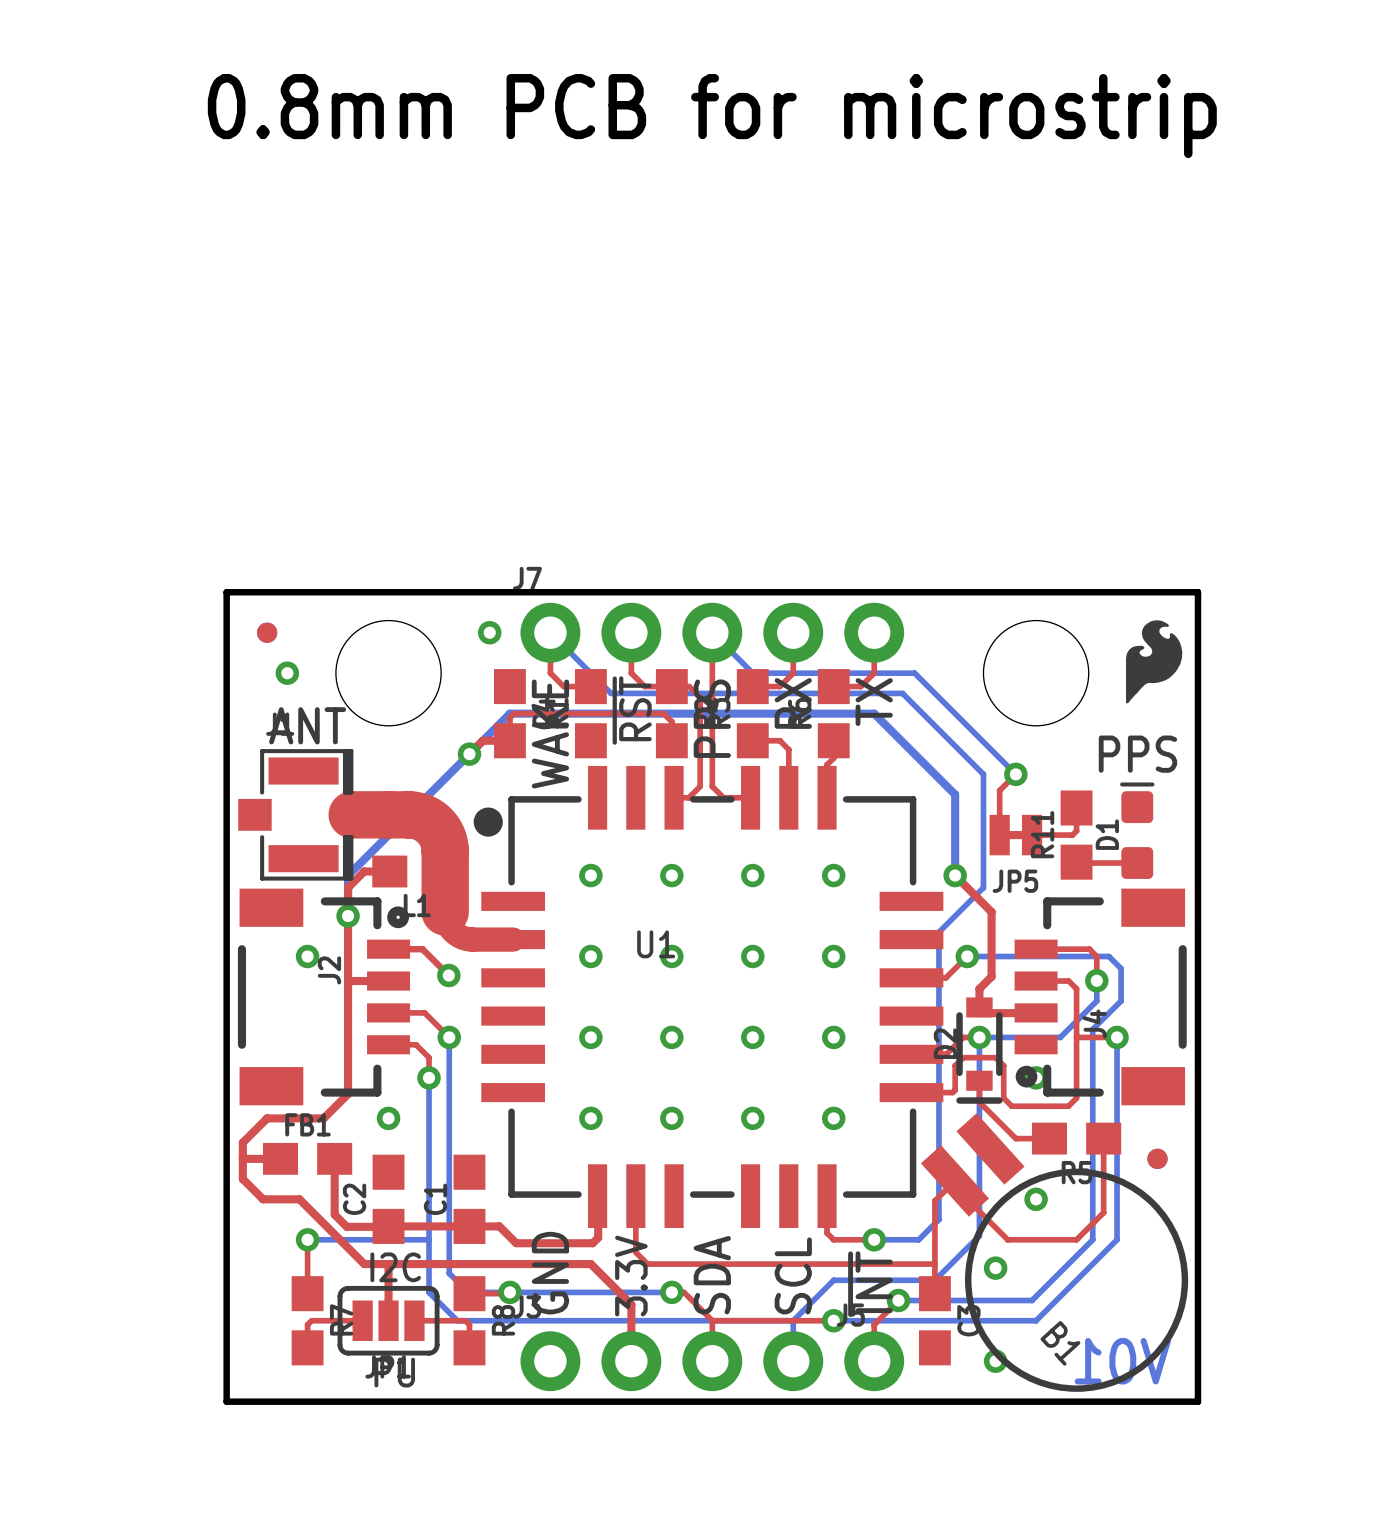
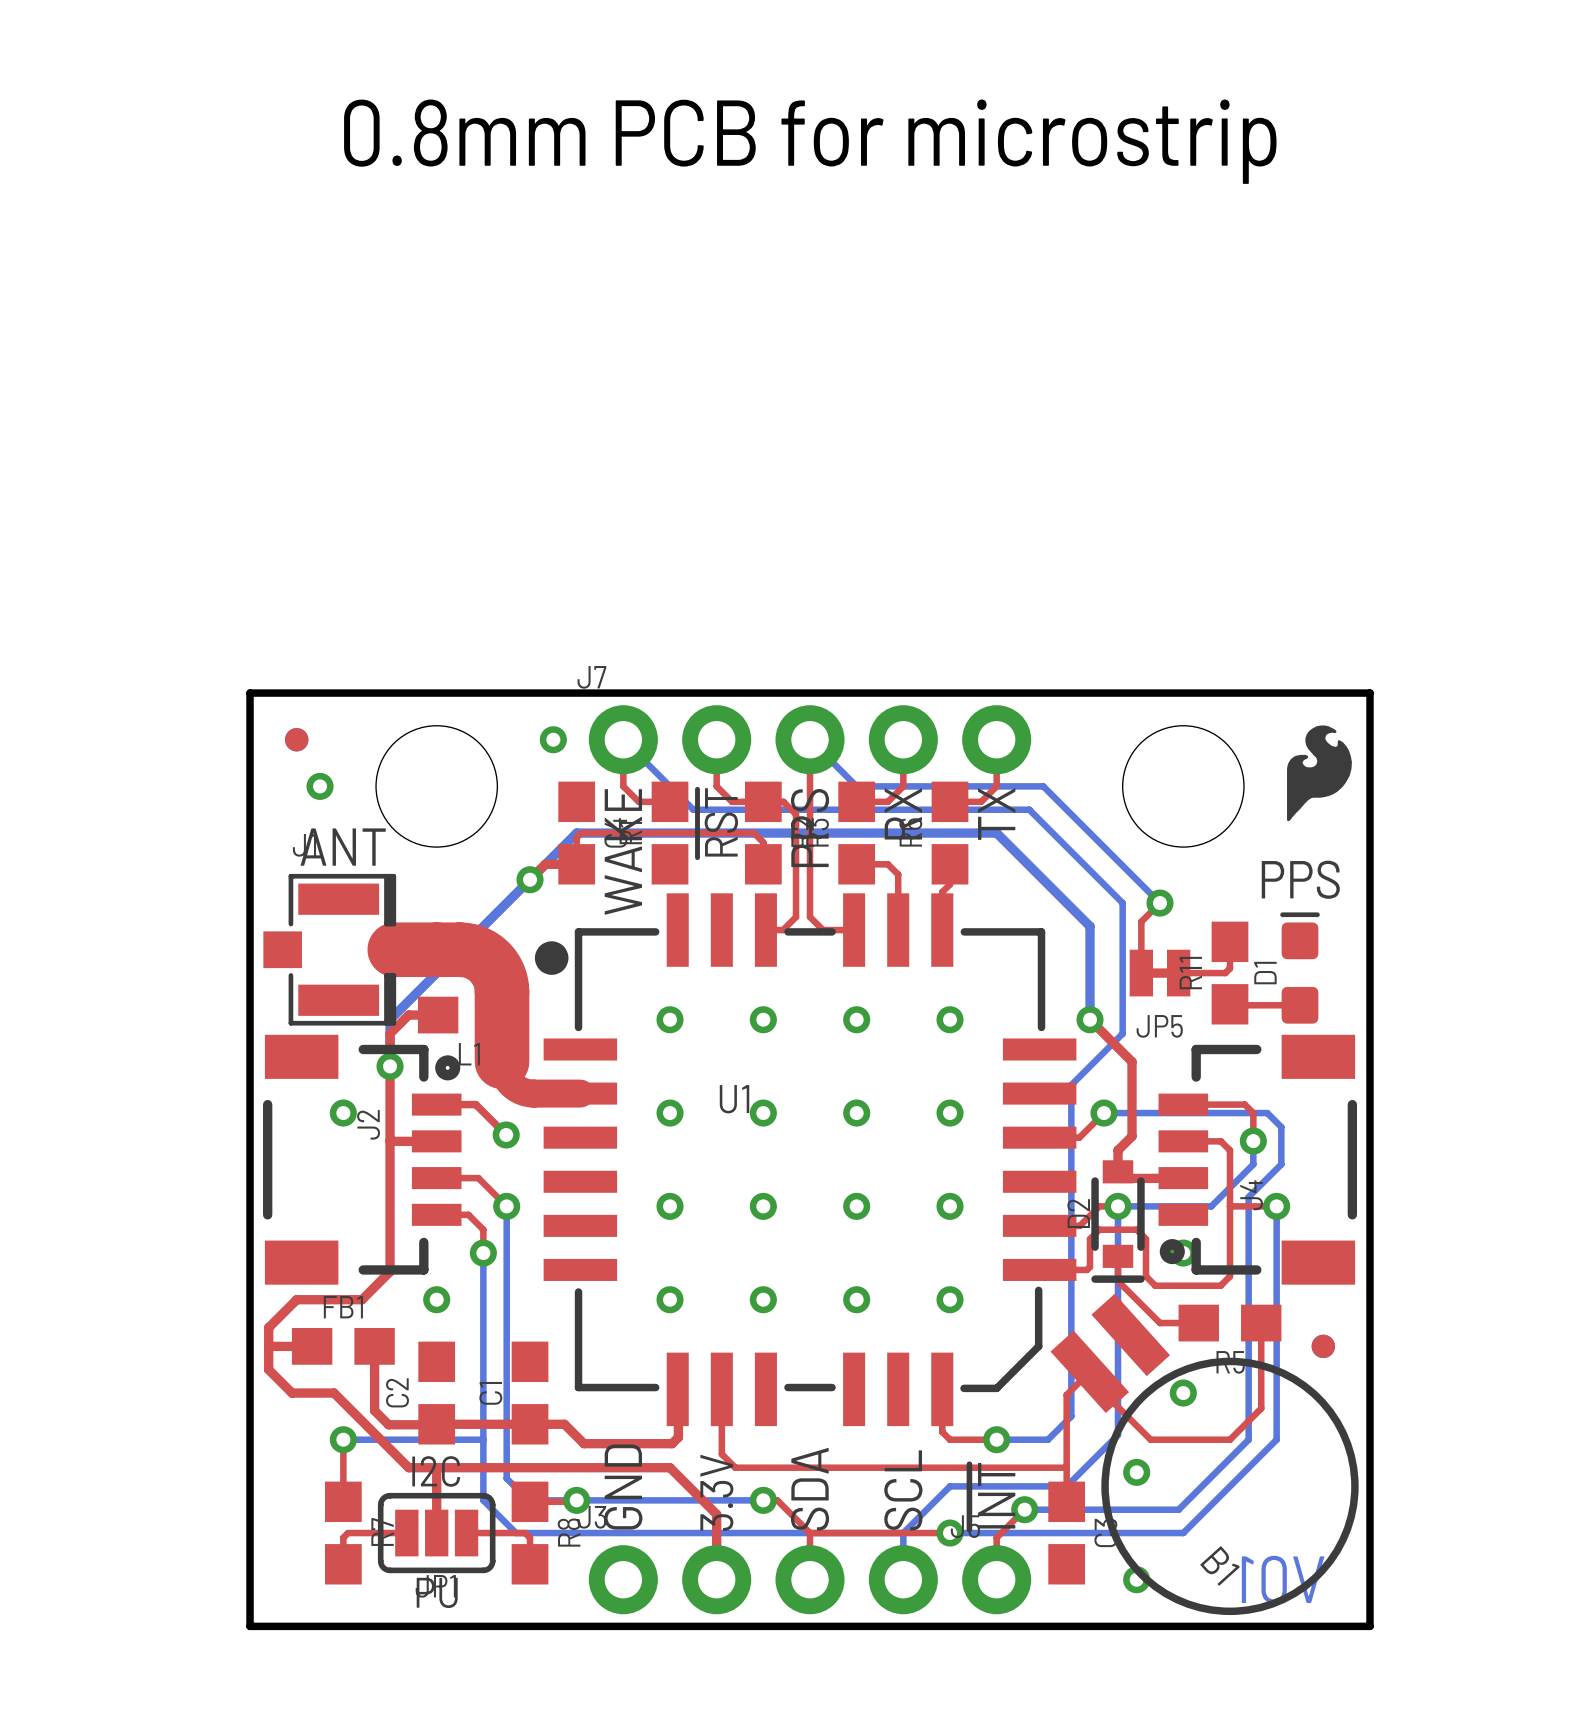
U1 footprint: [473, 765, 944, 1229] -> [534, 893, 1077, 1427]

